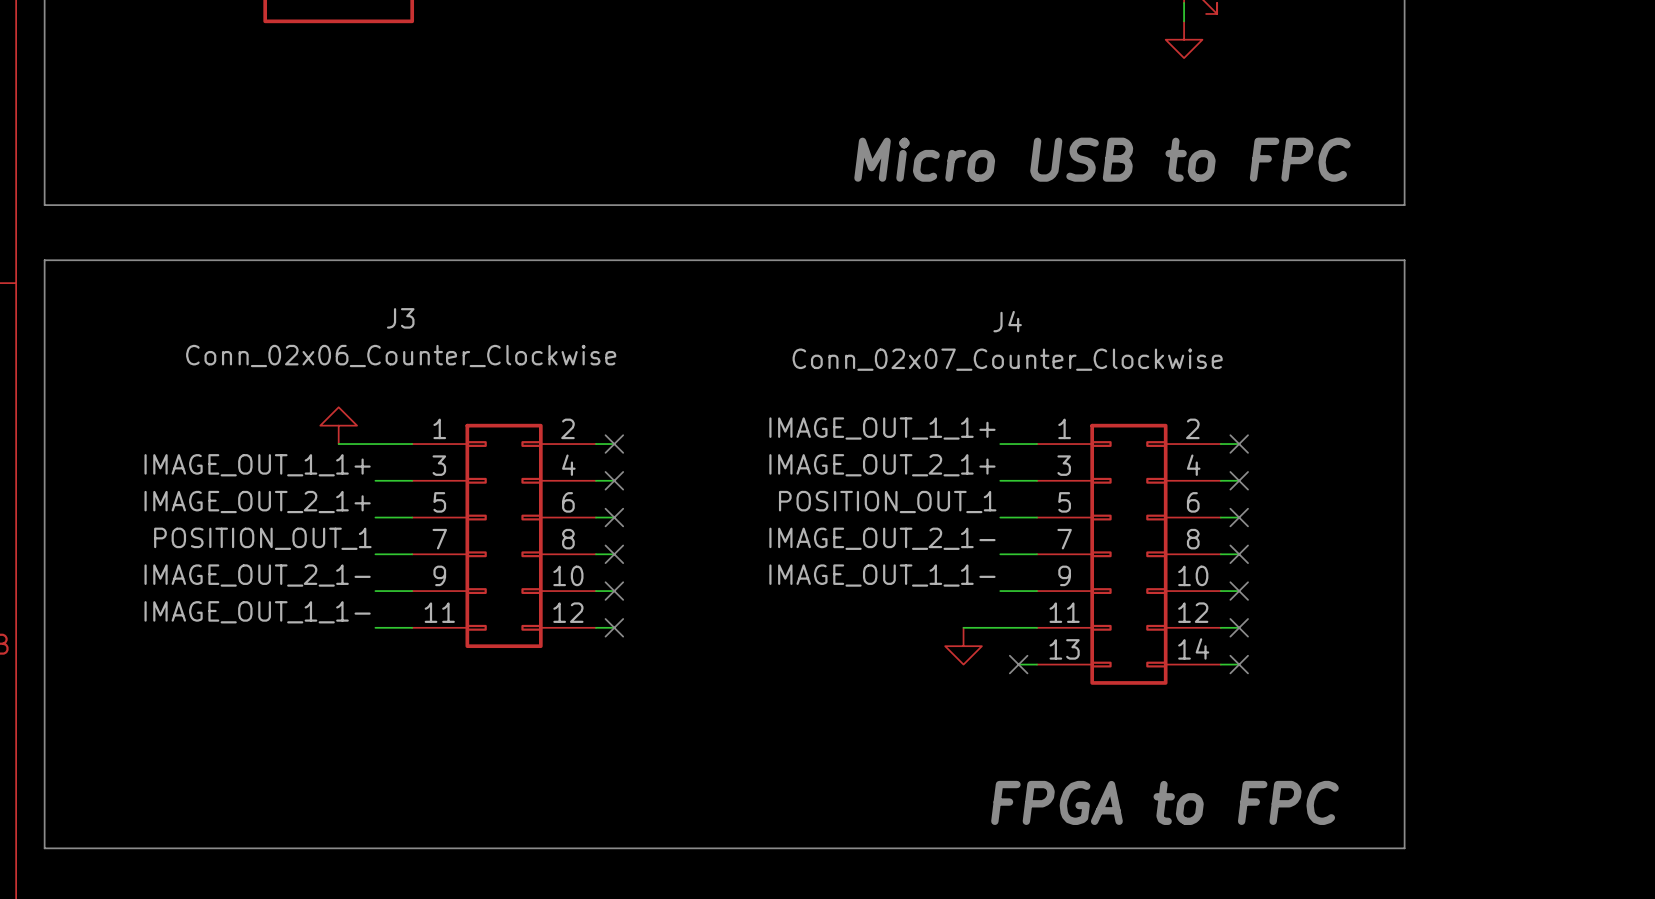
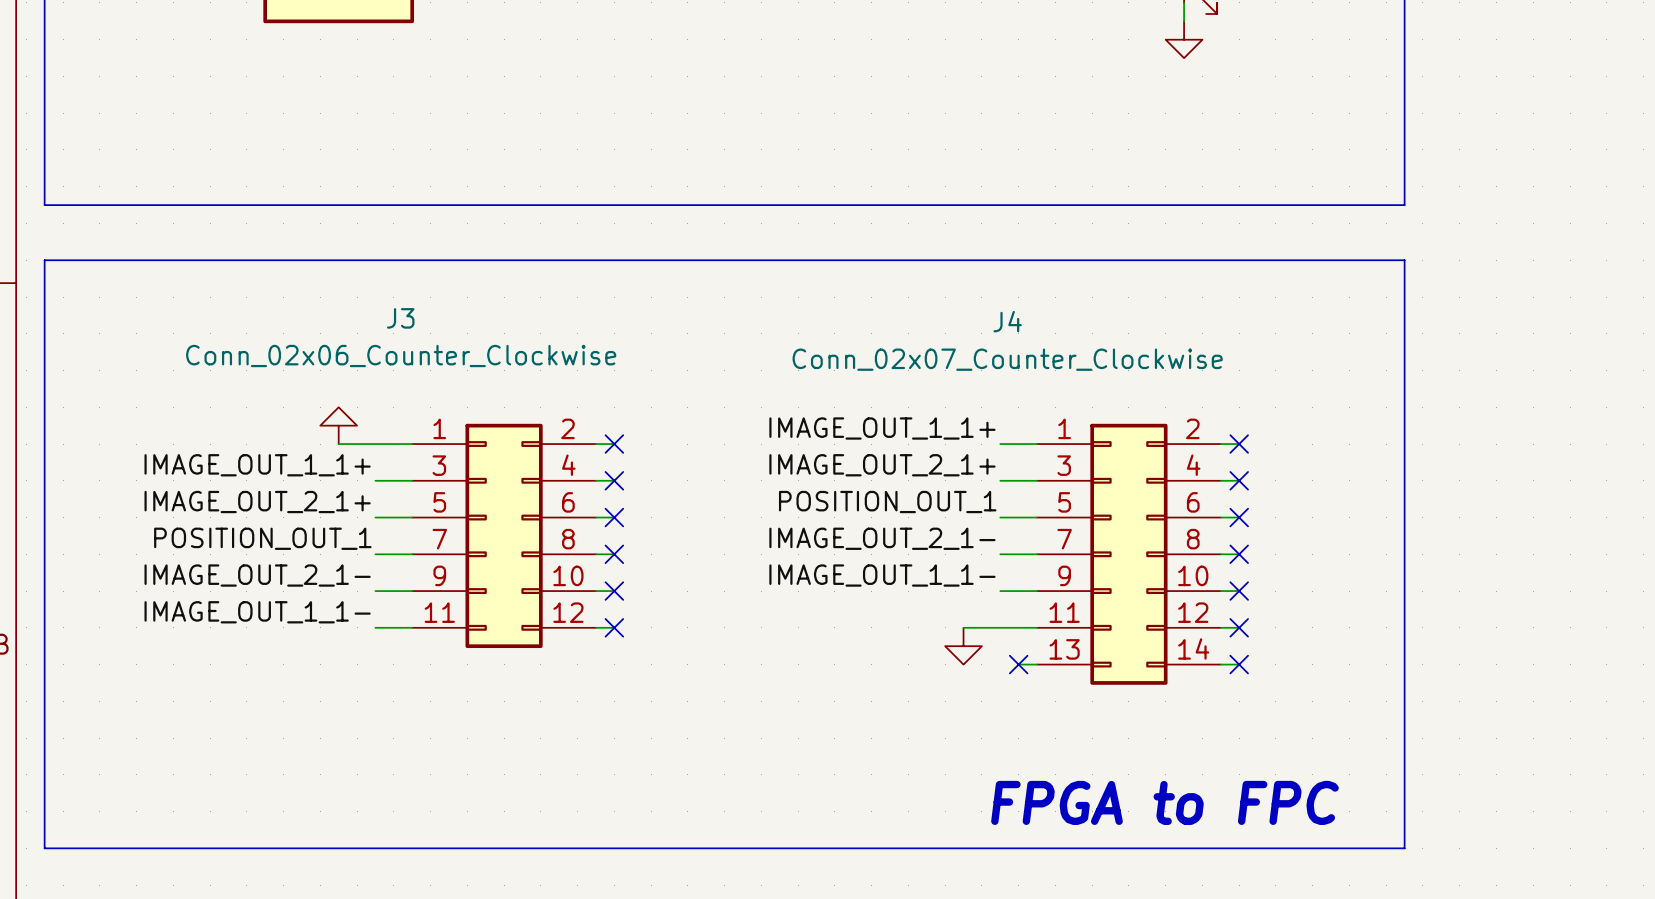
text: Micro USB to FPC (1102, 159) -> none

